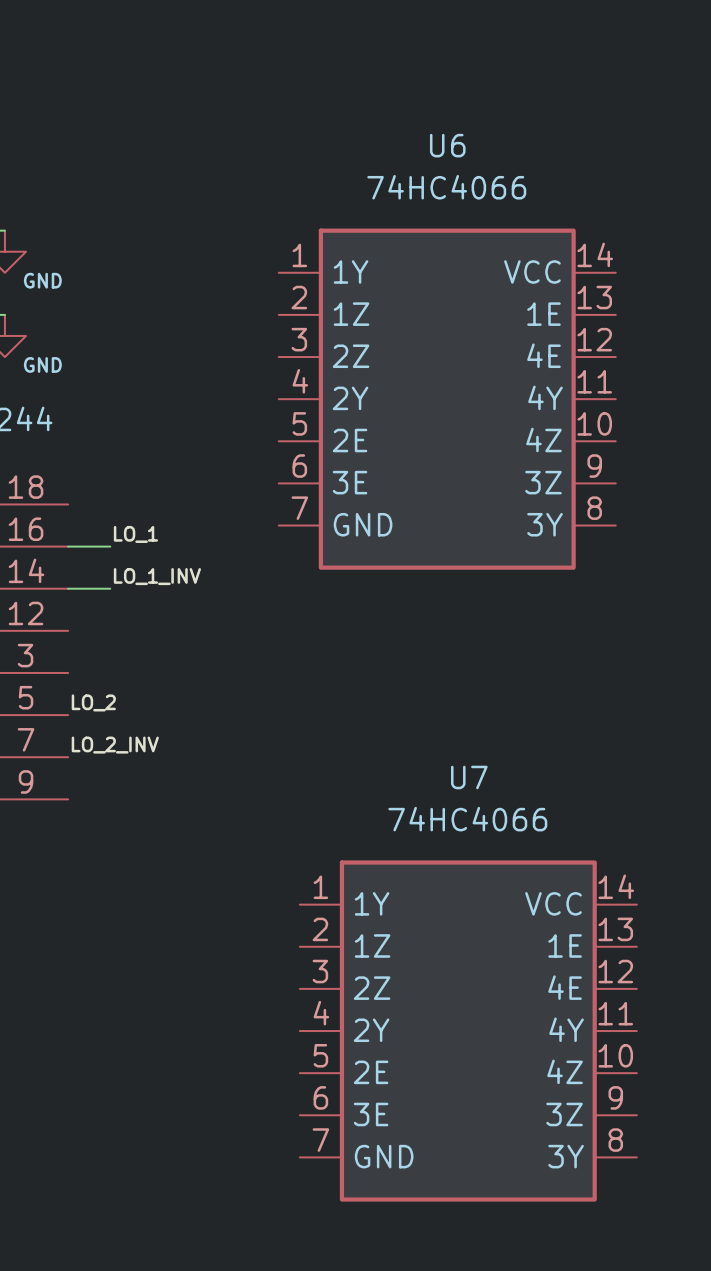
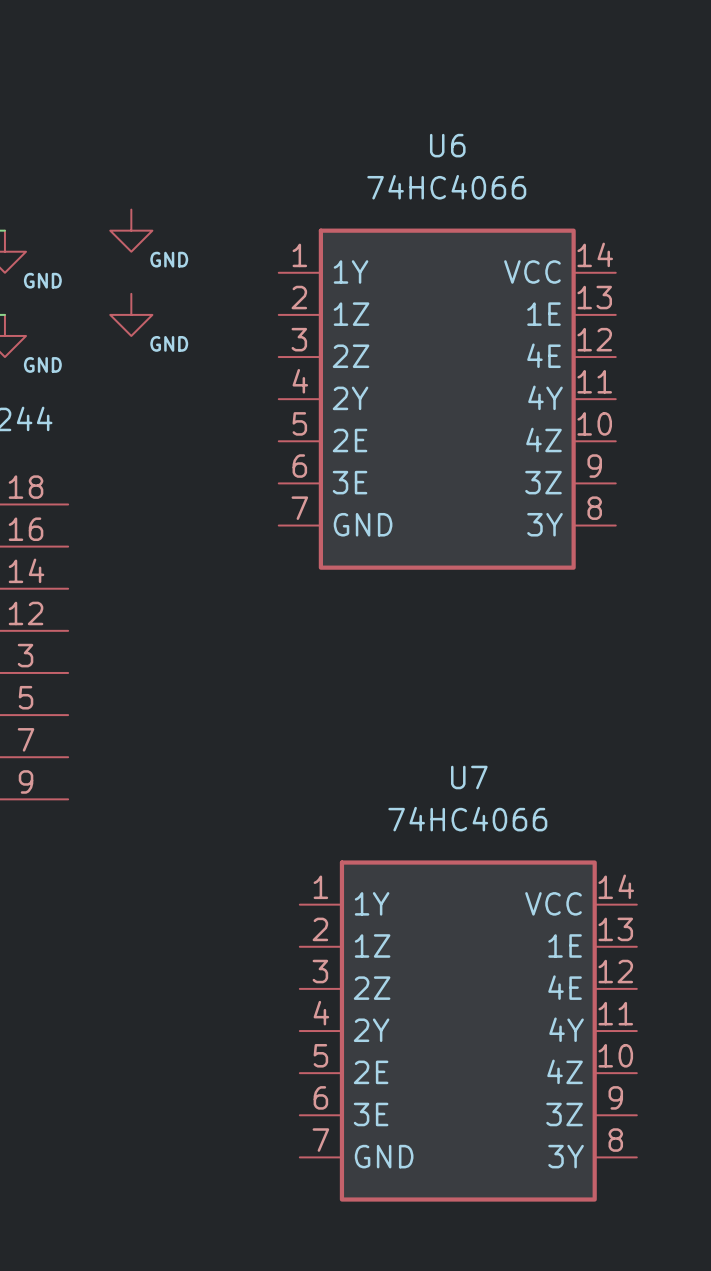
power symbol: none -> GND (131, 230)
power symbol: none -> GND (131, 314)
label: LO_1 (135, 534) -> none
wire: (68, 546) (110, 546) -> none
label: LO_1_INV (157, 576) -> none
wire: (68, 588) (110, 588) -> none
label: LO_2 (93, 702) -> none
label: LO_2_INV (115, 745) -> none

